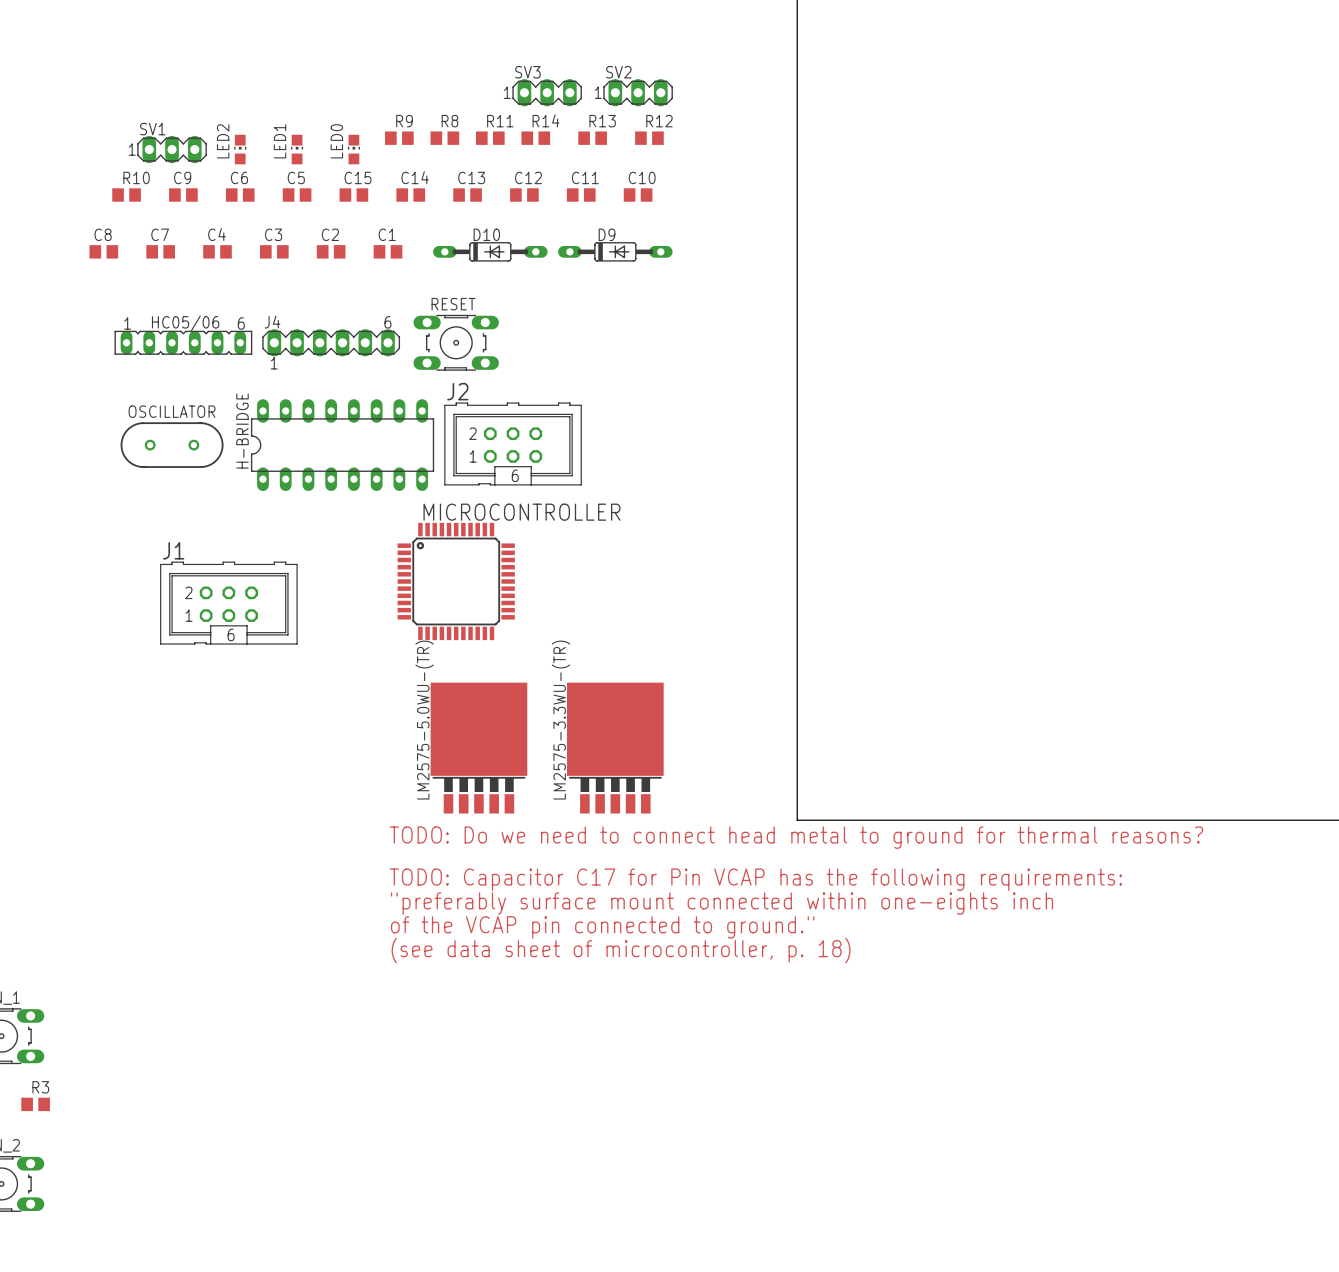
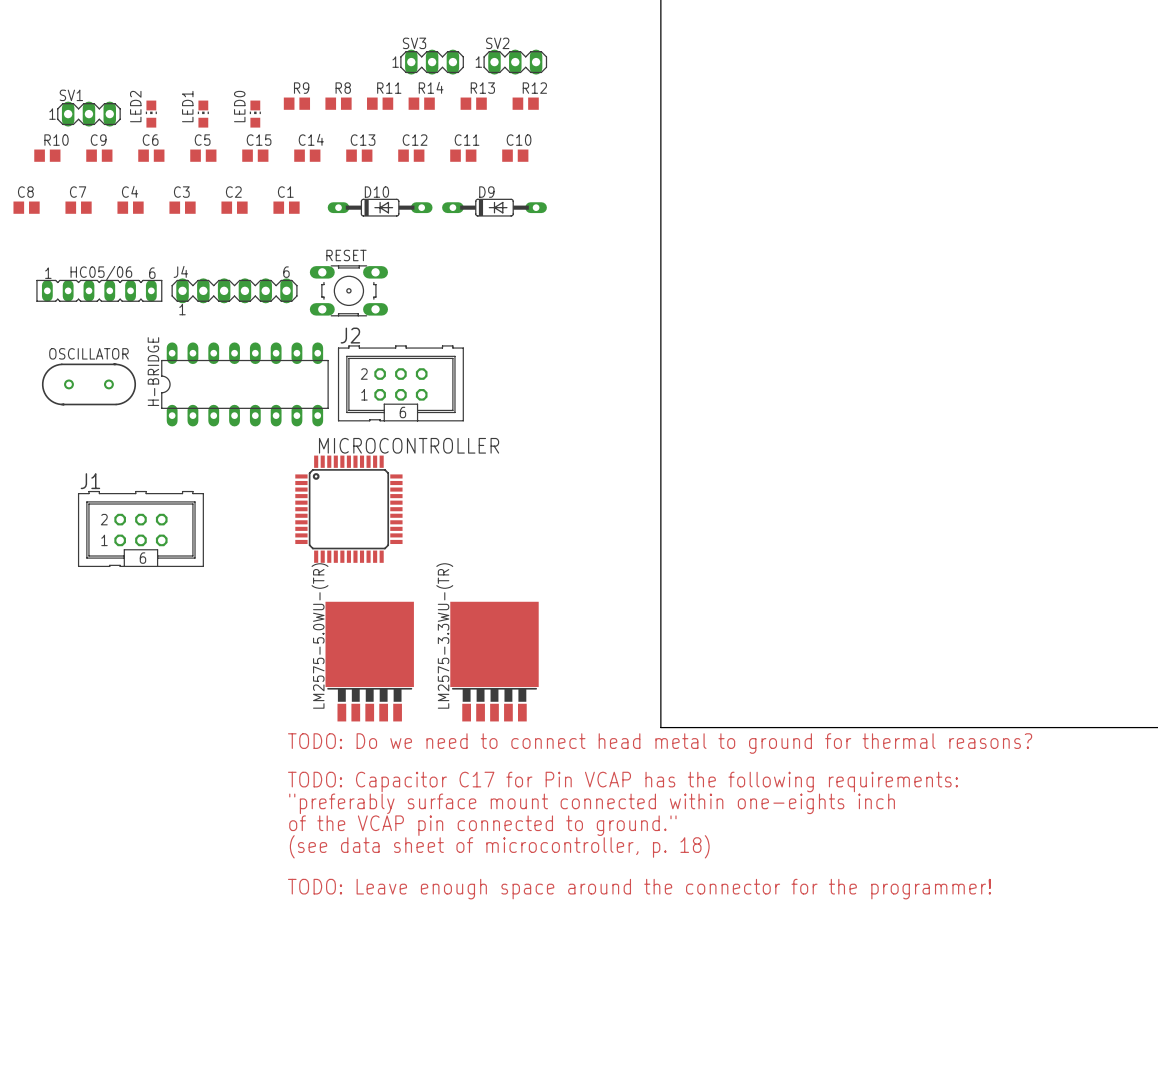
text: none -> TODO: Leave enough space around the connector for the programmer! (639, 889)

